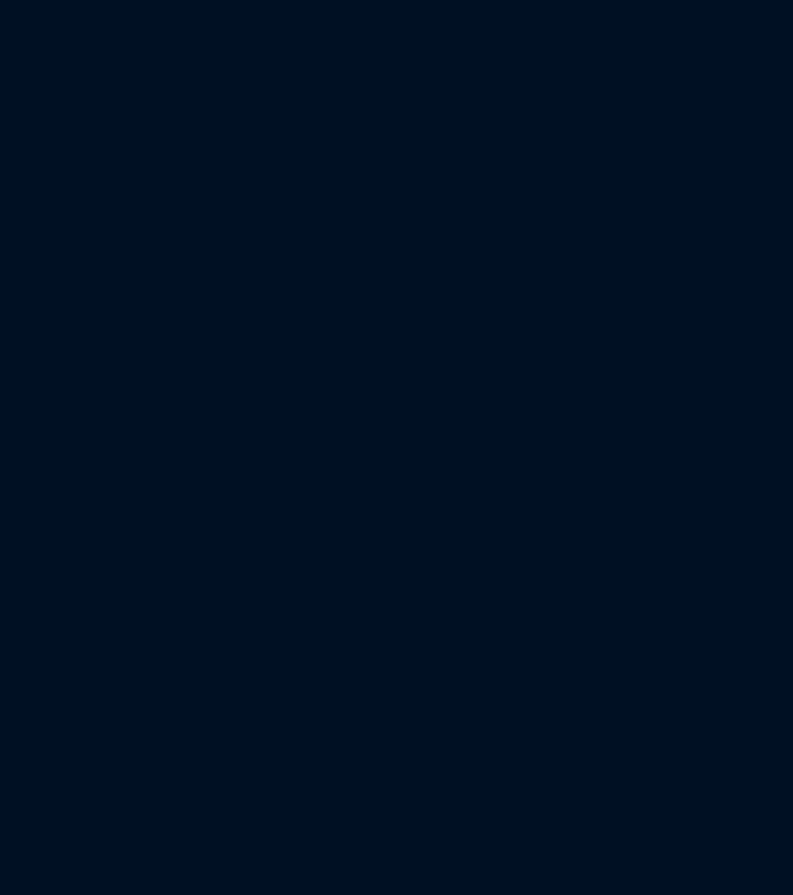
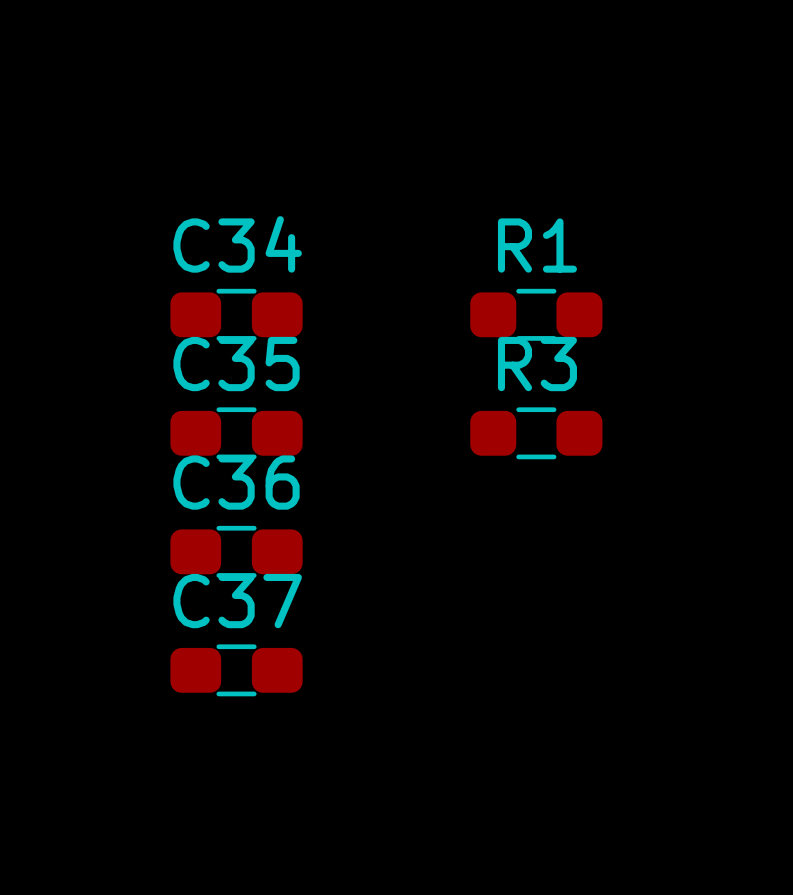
C34: none -> (236, 314)
R1: none -> (536, 314)
C35: none -> (236, 433)
R3: none -> (536, 433)
C36: none -> (236, 551)
C37: none -> (236, 670)

